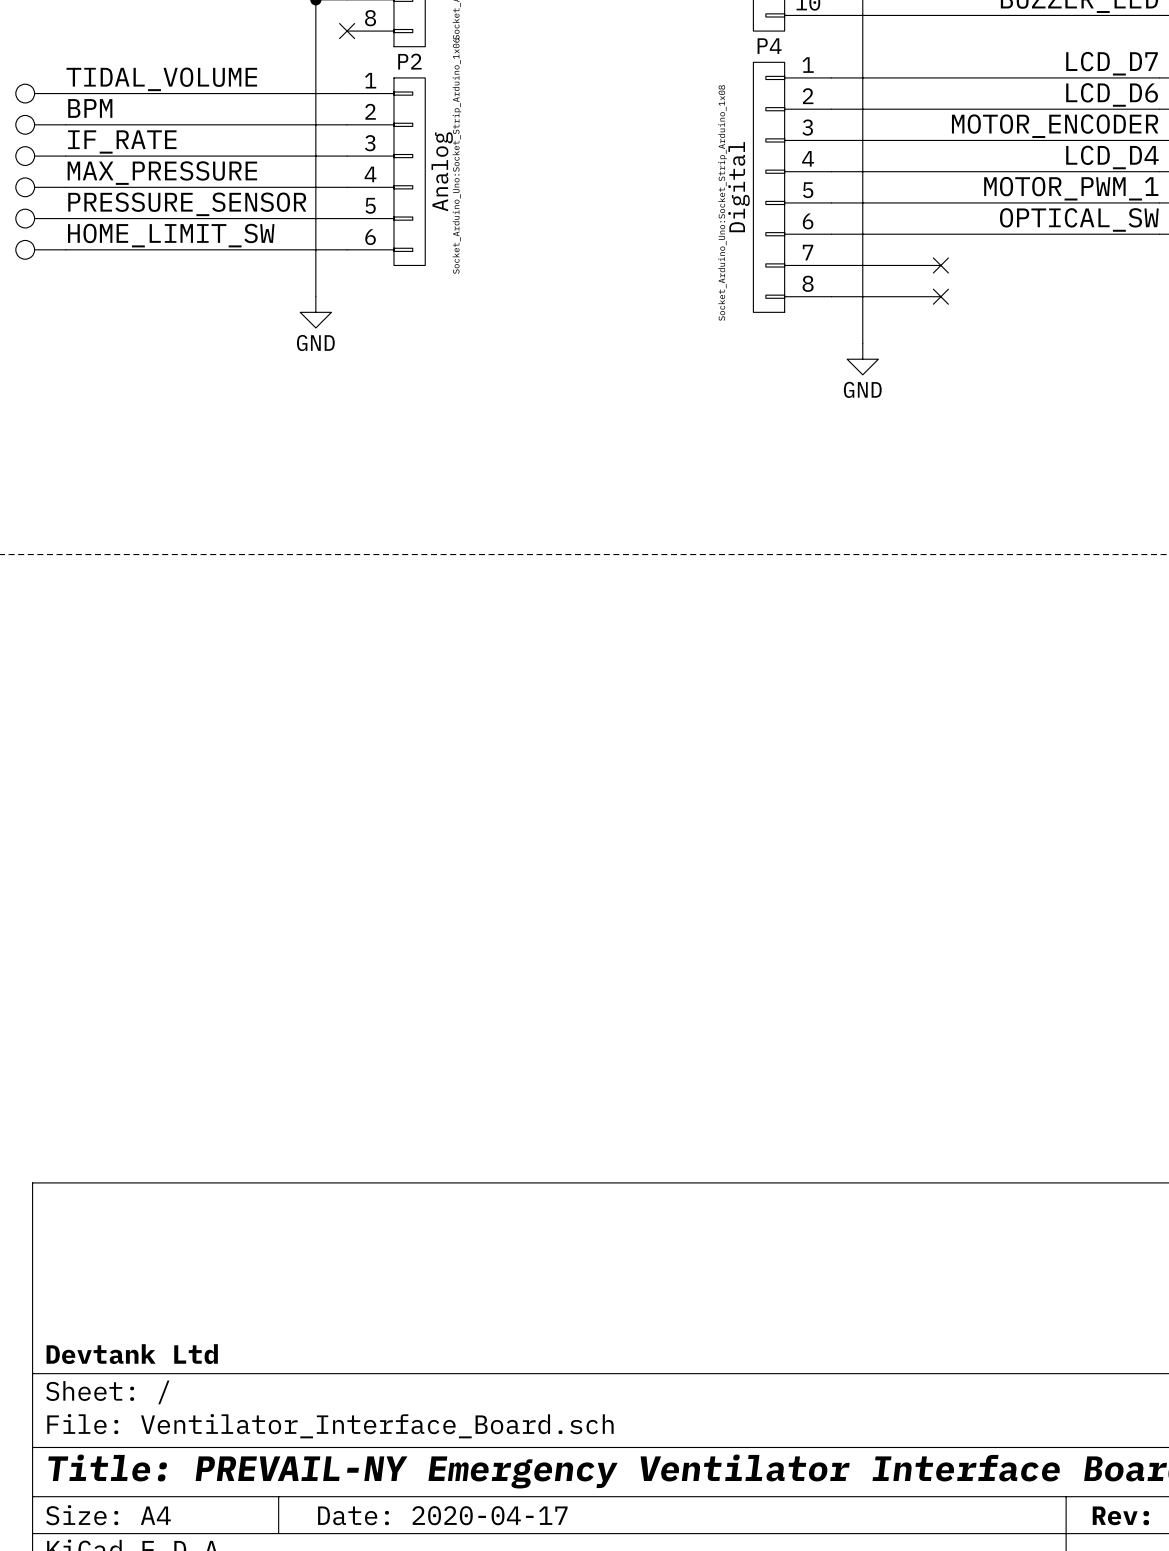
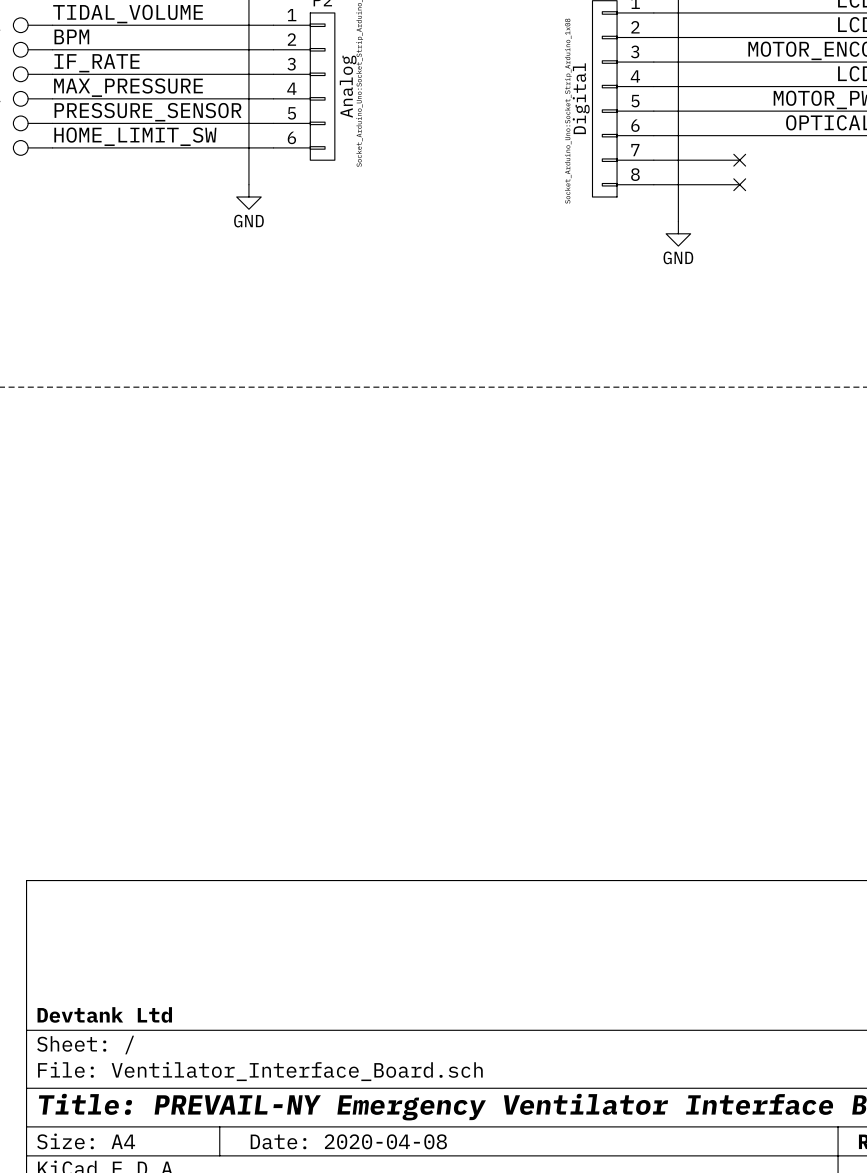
title block: Date: 2020-04-17 (442, 1515) -> Date: 2020-04-08 (348, 1141)

